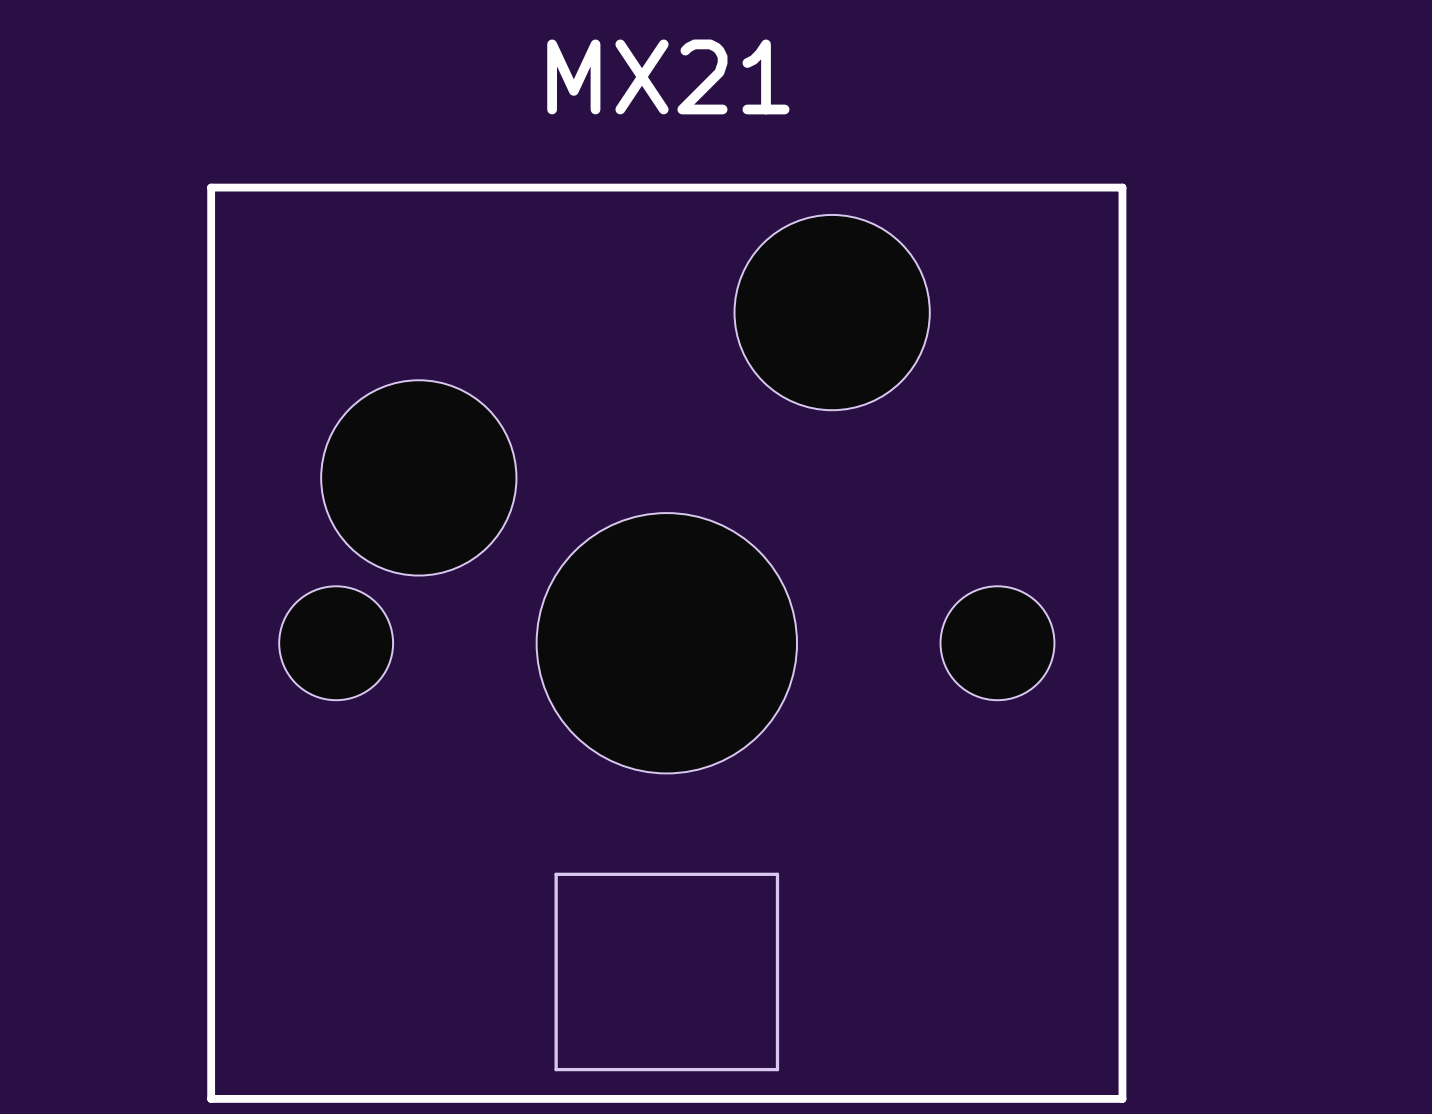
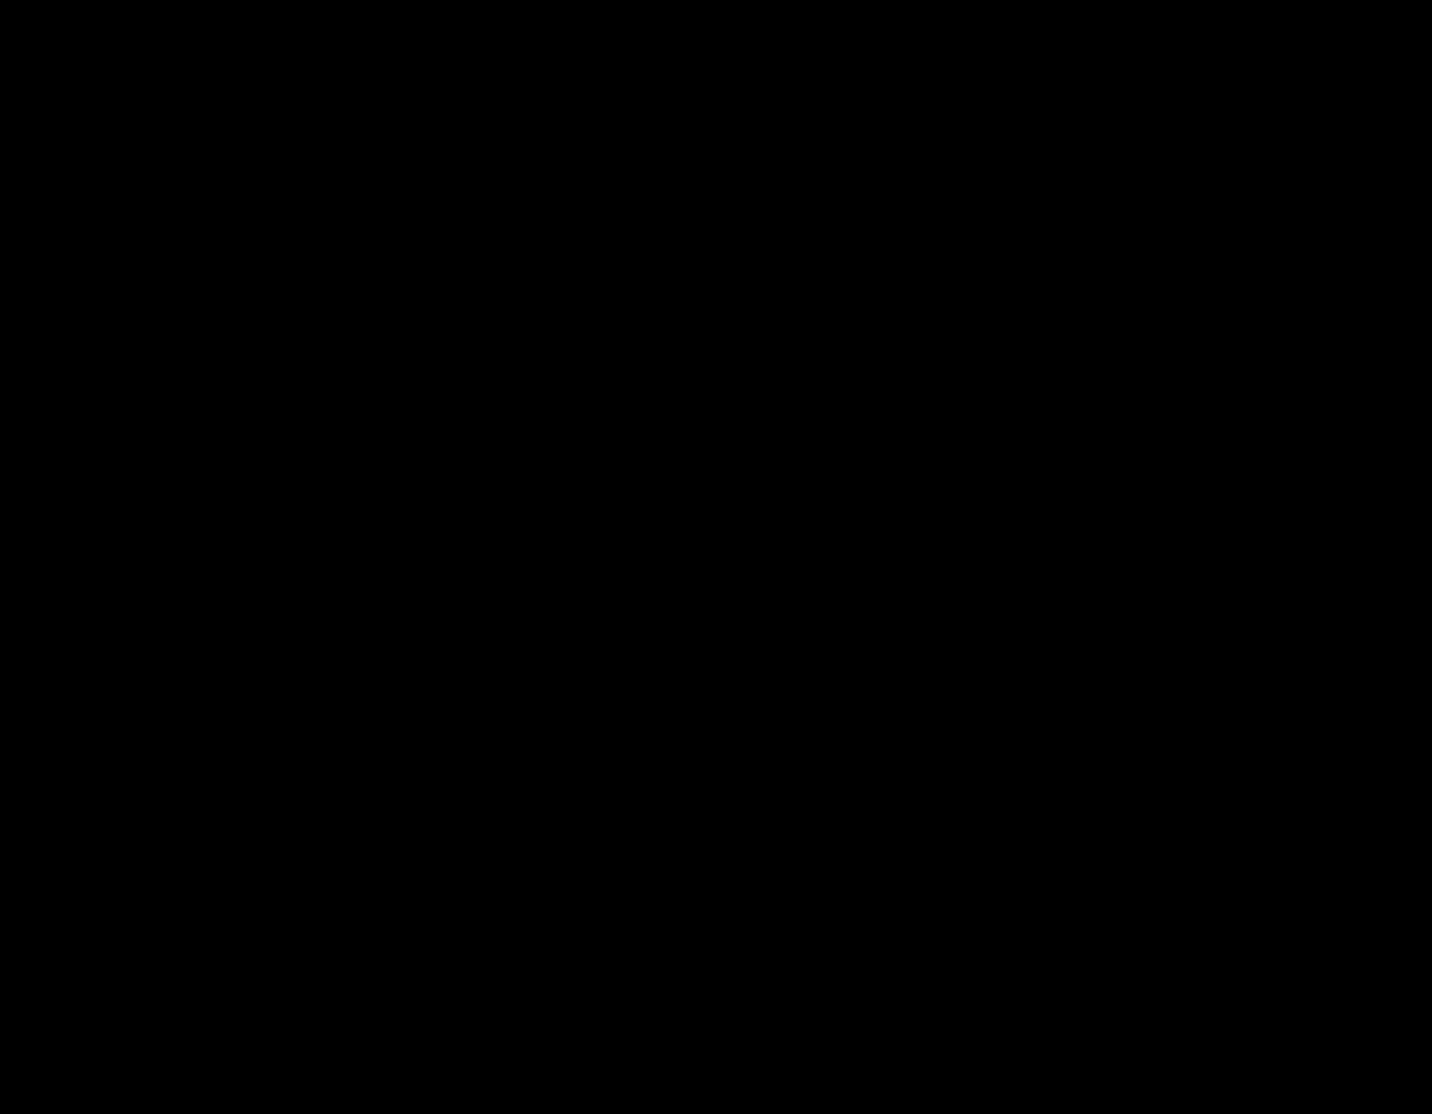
MX21: (666, 643) -> none

